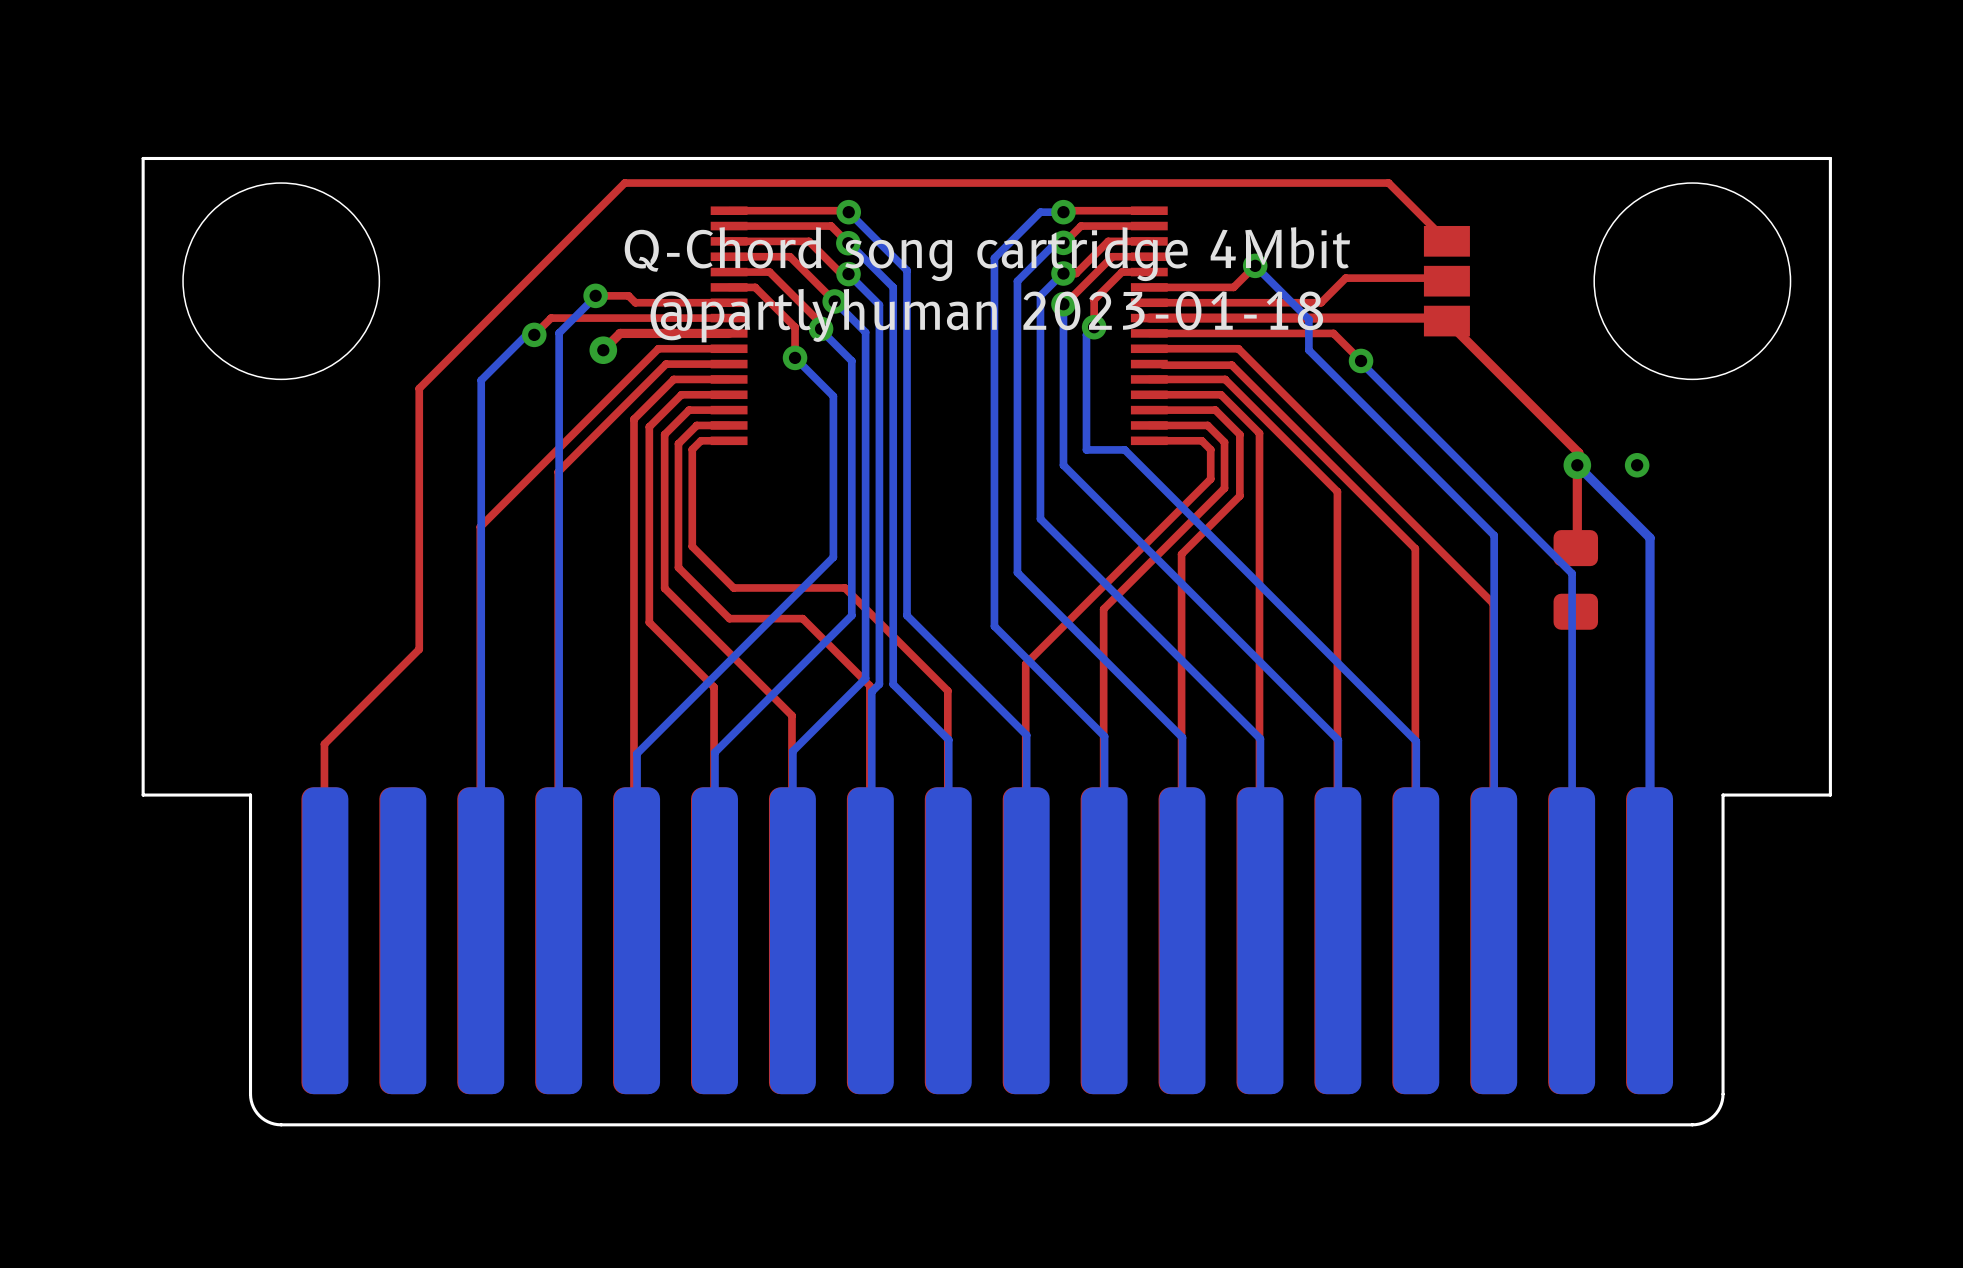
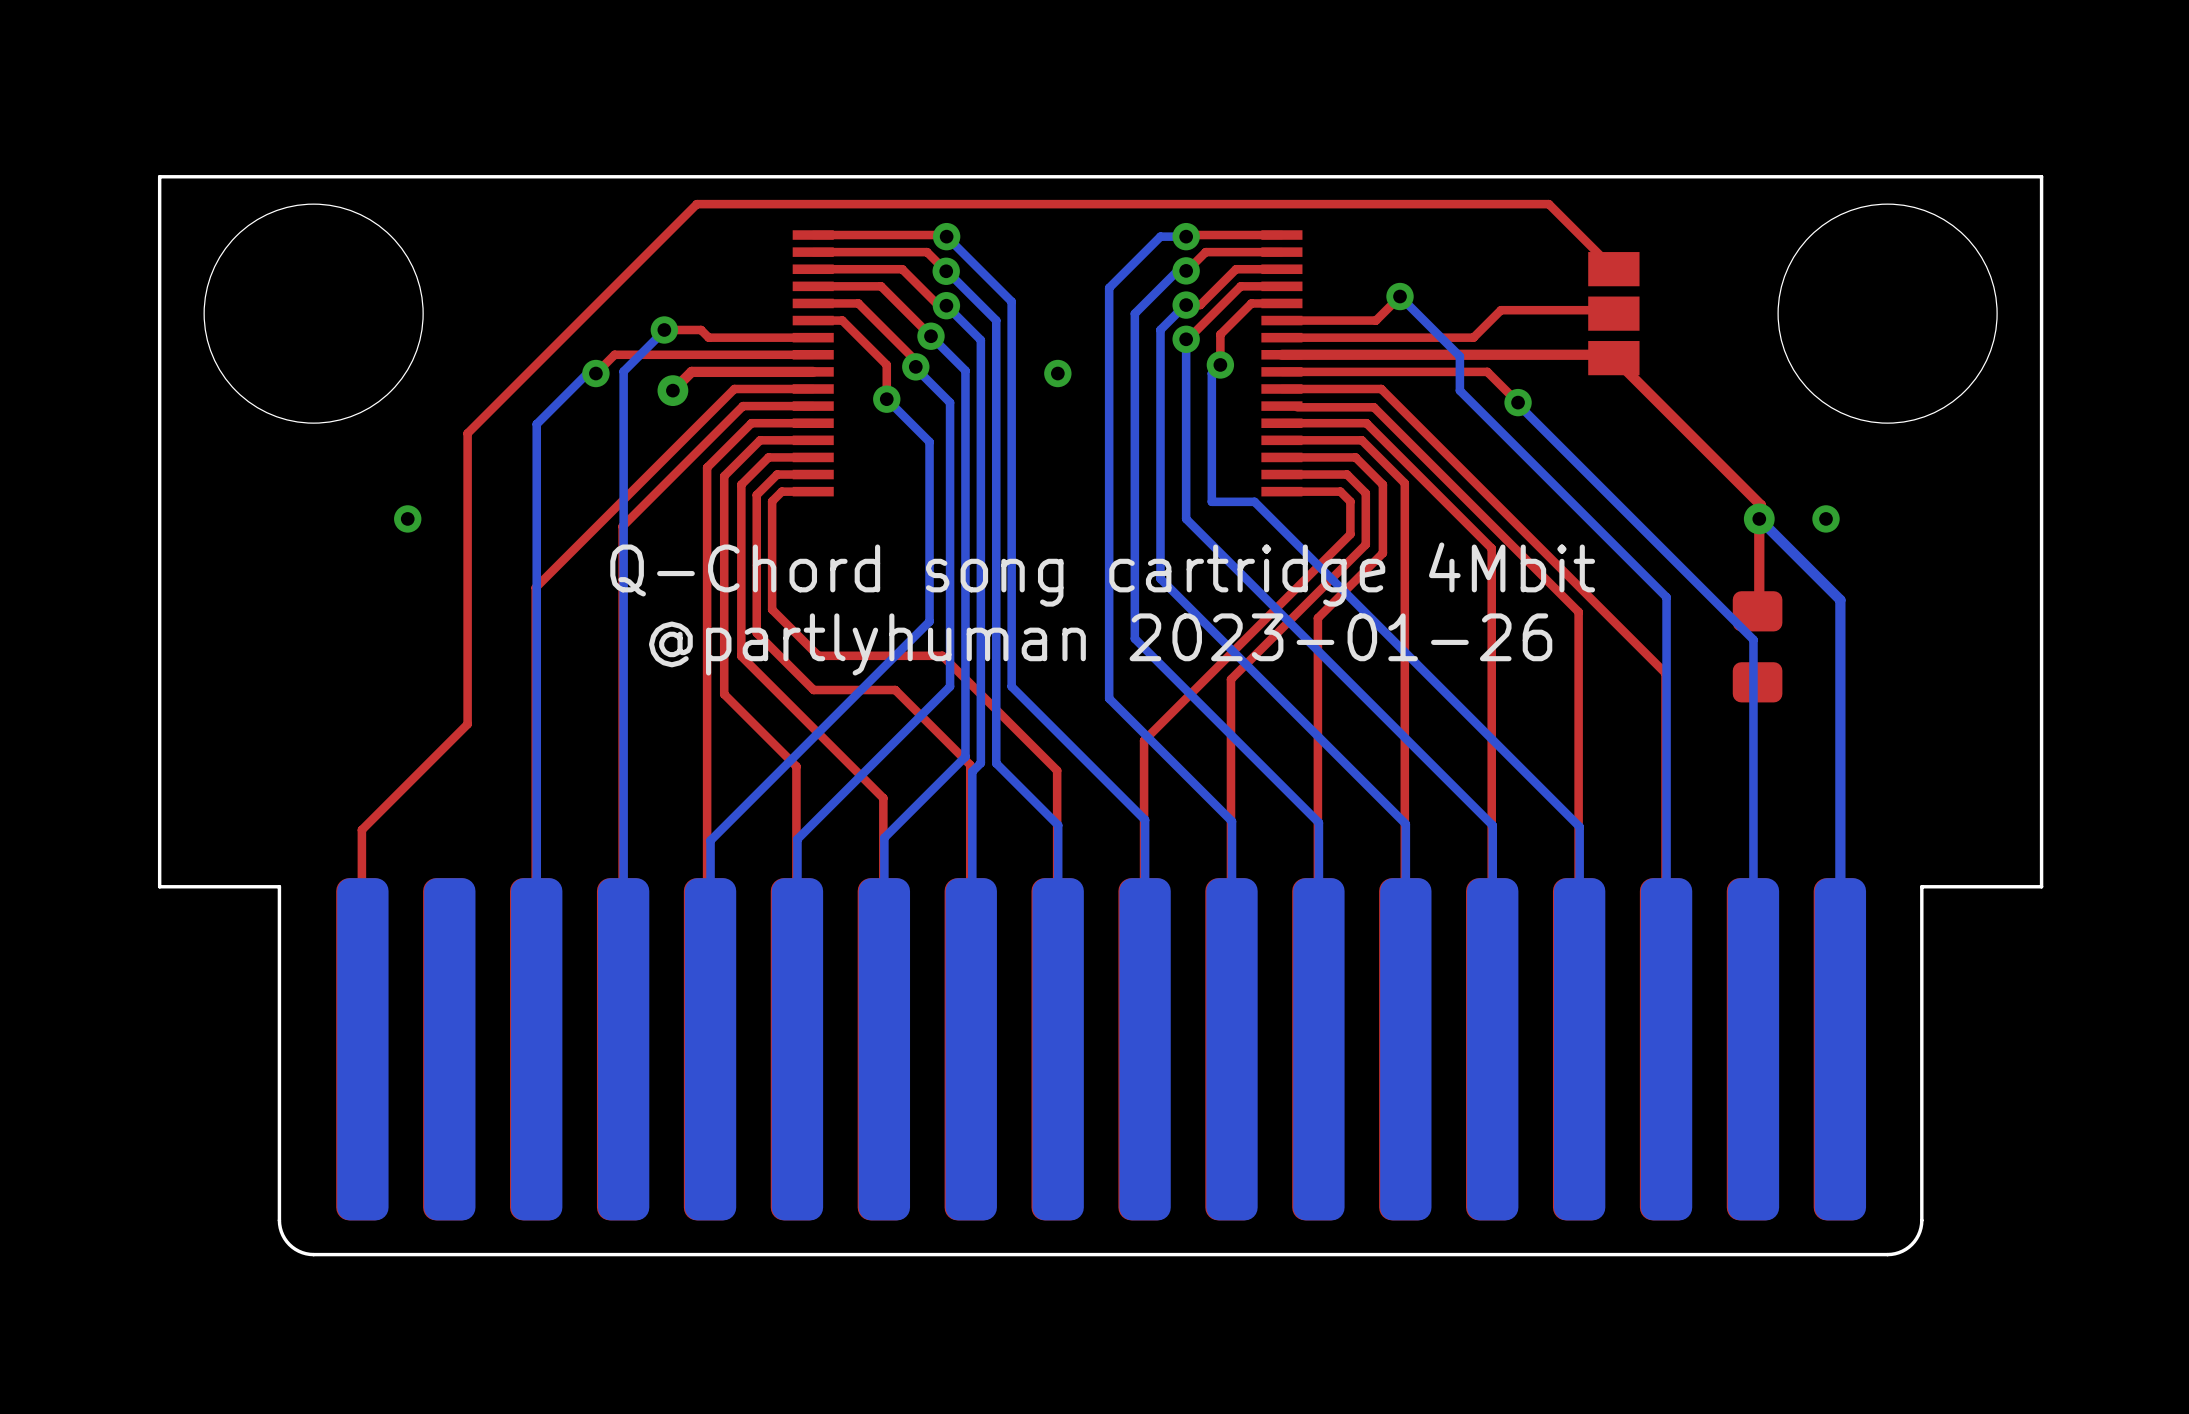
text position: Q-Chord song cartridge 4Mbit (987, 254) -> Q-Chord song cartridge 4Mbit (1102, 574)
text: @partlyhuman 2023-01-18 (986, 315) -> none
via: none -> (1057, 373)
via: none -> (407, 518)
text: none -> @partlyhuman 2023-01-26 (1100, 644)

